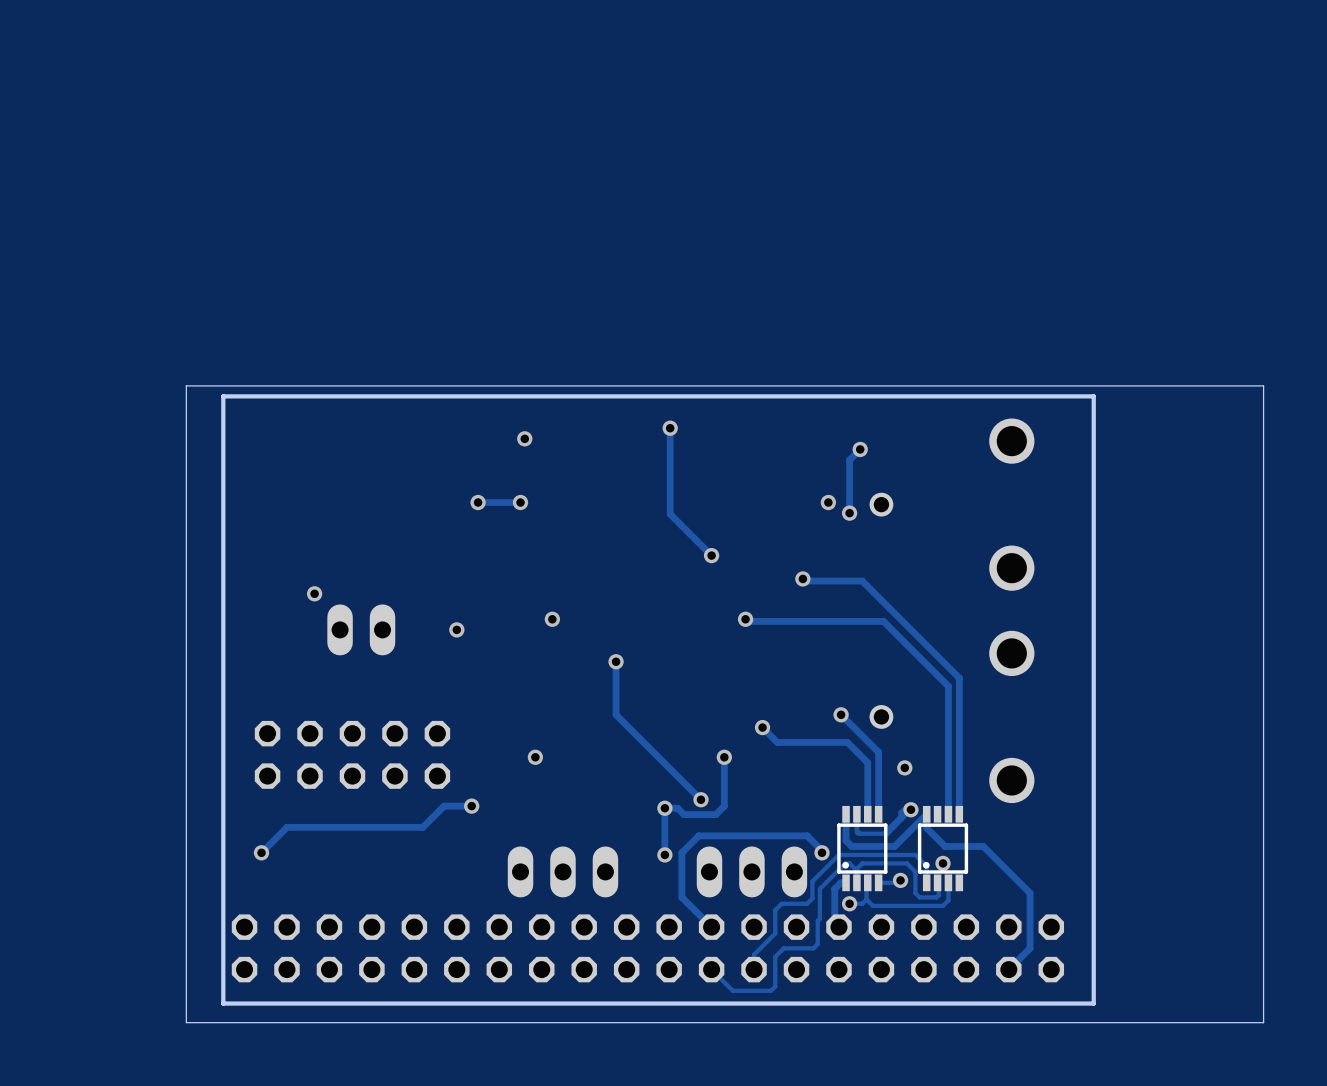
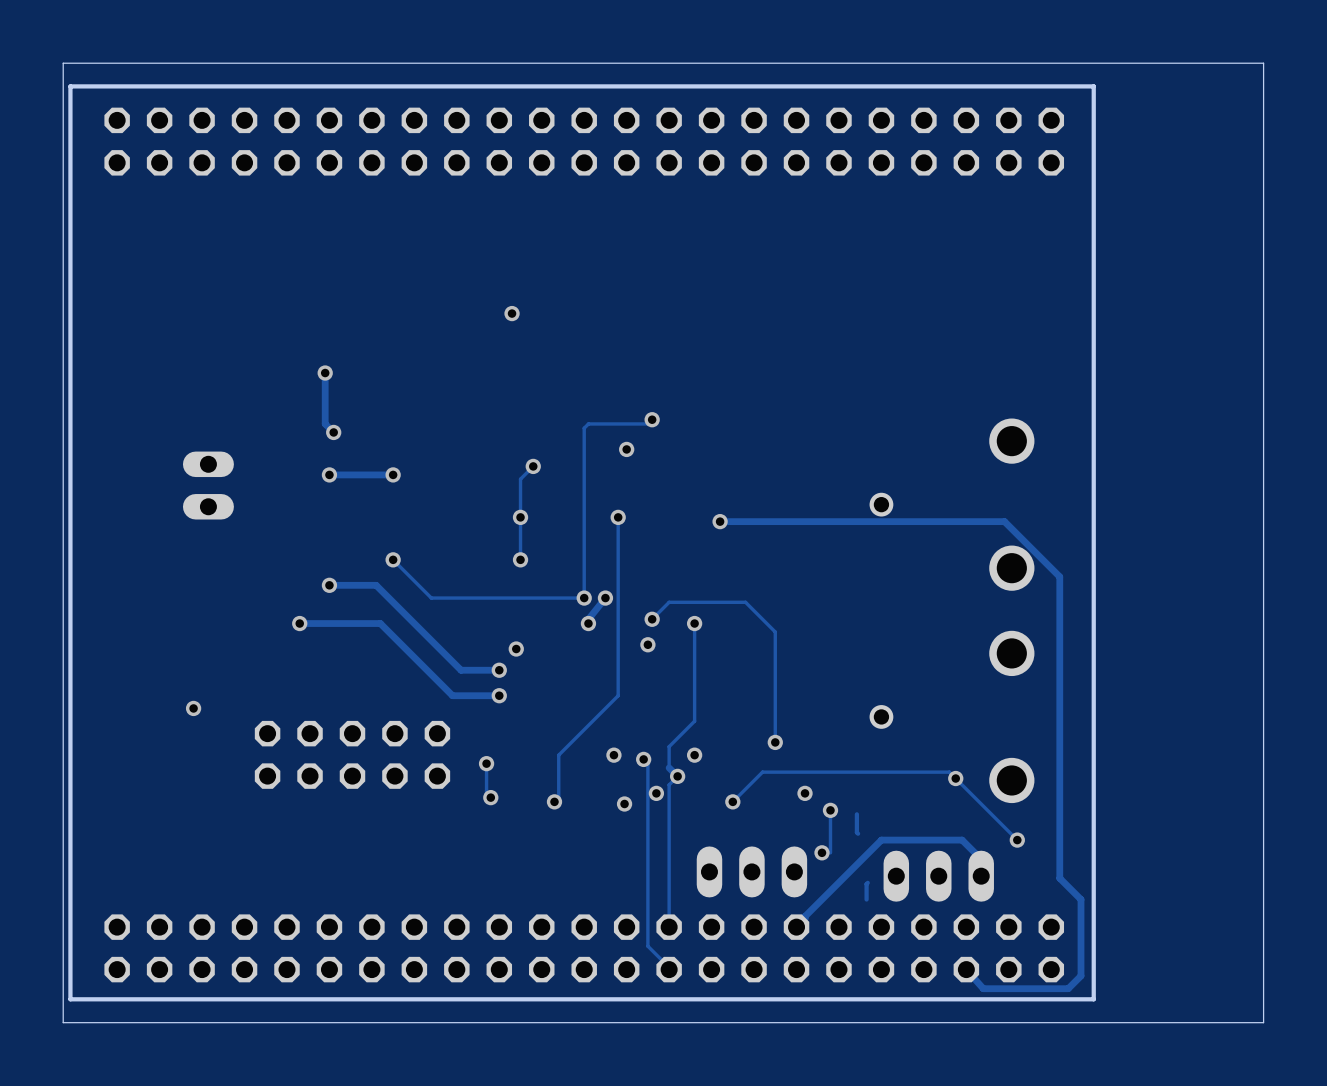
part: none -> (584, 141)
via: none -> (512, 313)
track: none -> (325, 373) (325, 423) (333, 432)
via: none -> (325, 373)
board edge: (1263, 385) (186, 385) (186, 1022) -> (1263, 385) (1263, 63) (63, 63) (63, 1022) (186, 1022)
board edge: (1093, 396) (223, 396) (223, 1003) (1093, 1003) (1093, 999) -> (1093, 396) (1093, 86) (70, 86) (70, 999) (1093, 999)
track: none -> (652, 419) (647, 423) (588, 423) (584, 428) (584, 598) (431, 598) (393, 559)
track: (670, 428) (670, 514) (711, 555) -> none
via position: (670, 428) -> (652, 419)
via: none -> (333, 432)
via: (524, 438) -> none
via: none -> (626, 449)
track: (860, 449) (849, 460) (849, 513) -> none
via: (860, 449) -> none
track: none -> (533, 466) (520, 479) (520, 559)
via: none -> (533, 466)
via: none -> (329, 474)
track: none -> (393, 474) (329, 474)
via: none -> (393, 474)
via: (478, 502) -> none
track: (520, 502) (478, 502) -> none
via position: (520, 502) -> (520, 517)
via: (828, 502) -> none
via: (849, 513) -> none
track: none -> (618, 517) (618, 695) (558, 755) (558, 797) (554, 801)
via: none -> (618, 517)
track: none -> (720, 521) (1004, 521) (1059, 576) (1059, 878) (1081, 899) (1081, 975) (1068, 988) (983, 988) (966, 969)
via: none -> (720, 521)
via: (711, 555) -> none
via: none -> (393, 559)
via: none -> (520, 559)
track: (802, 578) (805, 581) (862, 581) (959, 678) (959, 814) -> none
via: (802, 578) -> none
track: none -> (329, 585) (376, 585) (461, 670) (499, 670)
via: none -> (329, 585)
via: (314, 593) -> none
via: none -> (584, 598)
track: none -> (605, 598) (588, 619) (588, 623)
via: none -> (605, 598)
via: (552, 619) -> none
track: none -> (652, 619) (669, 602) (745, 602) (775, 632) (775, 742)
via: none -> (652, 619)
track: (745, 619) (747, 621) (883, 621) (948, 686) (948, 814) -> none
via: (745, 619) -> none
track: none -> (299, 623) (380, 623) (452, 695) (499, 695)
via: none -> (299, 623)
via: none -> (588, 623)
via: none -> (694, 623)
part rotation: 0° (361, 629) -> 90° clockwise (208, 485)
part position: (361, 629) -> (208, 485)
via: (456, 629) -> none
via: none -> (647, 644)
via: none -> (516, 649)
track: (616, 661) (616, 714) (669, 767) -> (694, 623) (694, 721) (669, 746) (669, 767)
via: (616, 661) -> none
via: none -> (499, 670)
via: none -> (499, 695)
via: none -> (193, 708)
track: (841, 714) (878, 752) (878, 814) -> none
via: (841, 714) -> none
track: (762, 727) (777, 742) (847, 742) (867, 762) (867, 814) -> none
via position: (762, 727) -> (775, 742)
via: none -> (613, 755)
via: none -> (694, 755)
via: (535, 757) -> none
track: (724, 757) (724, 806) (715, 814) (684, 814) (677, 808) (664, 808) (664, 854) -> none
via: (724, 757) -> none
track: none -> (643, 759) (647, 763) (647, 946) (669, 969)
via: none -> (643, 759)
track: none -> (486, 763) (486, 793) (490, 797)
via: none -> (486, 763)
via: (904, 767) -> none
track: (677, 776) (700, 799) -> (677, 776) (669, 784) (669, 927)
via: none -> (677, 776)
via: none -> (955, 778)
via: none -> (656, 793)
via: none -> (805, 793)
via: (700, 799) -> none
via: none -> (554, 801)
track: none -> (732, 801) (762, 772) (949, 772) (1017, 840)
via: none -> (732, 801)
via: none -> (624, 803)
track: (471, 806) (444, 806) (422, 827) (286, 827) (261, 852) -> none
via position: (471, 806) -> (490, 797)
via: (664, 808) -> none
track: (904, 808) (900, 812) (900, 818) (885, 833) (885, 831) (902, 814) -> none
track: (910, 809) (887, 833) (860, 833) (856, 830) -> none
via: (910, 809) -> none
track: none -> (830, 810) (830, 852)
via: none -> (830, 810)
track: (846, 814) (846, 840) (851, 846) (894, 846) (926, 814) (926, 828) (945, 846) (983, 846) (1030, 893) (1030, 948) (1008, 969) -> none
via: none -> (1017, 840)
part: (862, 848) -> none
part: (943, 848) -> none
via: (261, 852) -> none
track: (822, 852) (807, 835) (698, 835) (681, 852) (681, 897) (711, 927) -> none
via: (664, 854) -> none
via: (943, 863) -> none
track: (856, 870) (849, 863) (845, 863) (819, 888) (817, 944) (813, 948) (783, 948) (775, 956) (775, 986) (771, 990) (732, 990) (711, 969) -> none
part position: (562, 871) -> (938, 876)
track: none -> (981, 876) (981, 859) (962, 840) (881, 840) (796, 927)
track: (900, 880) (898, 882) (878, 882) -> none
via: (900, 880) -> none
track: (846, 882) (840, 882) (834, 888) (834, 922) (838, 927) -> none
track: (926, 882) (926, 866) (915, 854) (838, 854) (812, 881) (812, 898) (807, 903) (781, 903) (775, 910) (775, 933) (754, 954) (754, 969) -> none
track: (937, 882) (938, 895) (936, 897) (919, 897) (915, 893) (915, 871) (906, 863) (862, 863) (856, 868) (856, 882) -> none
track: (948, 882) (948, 900) (943, 905) (872, 905) (866, 899) (862, 903) (849, 903) -> none
via: (849, 903) -> none
part: none -> (584, 948)
part: (647, 948) -> none

